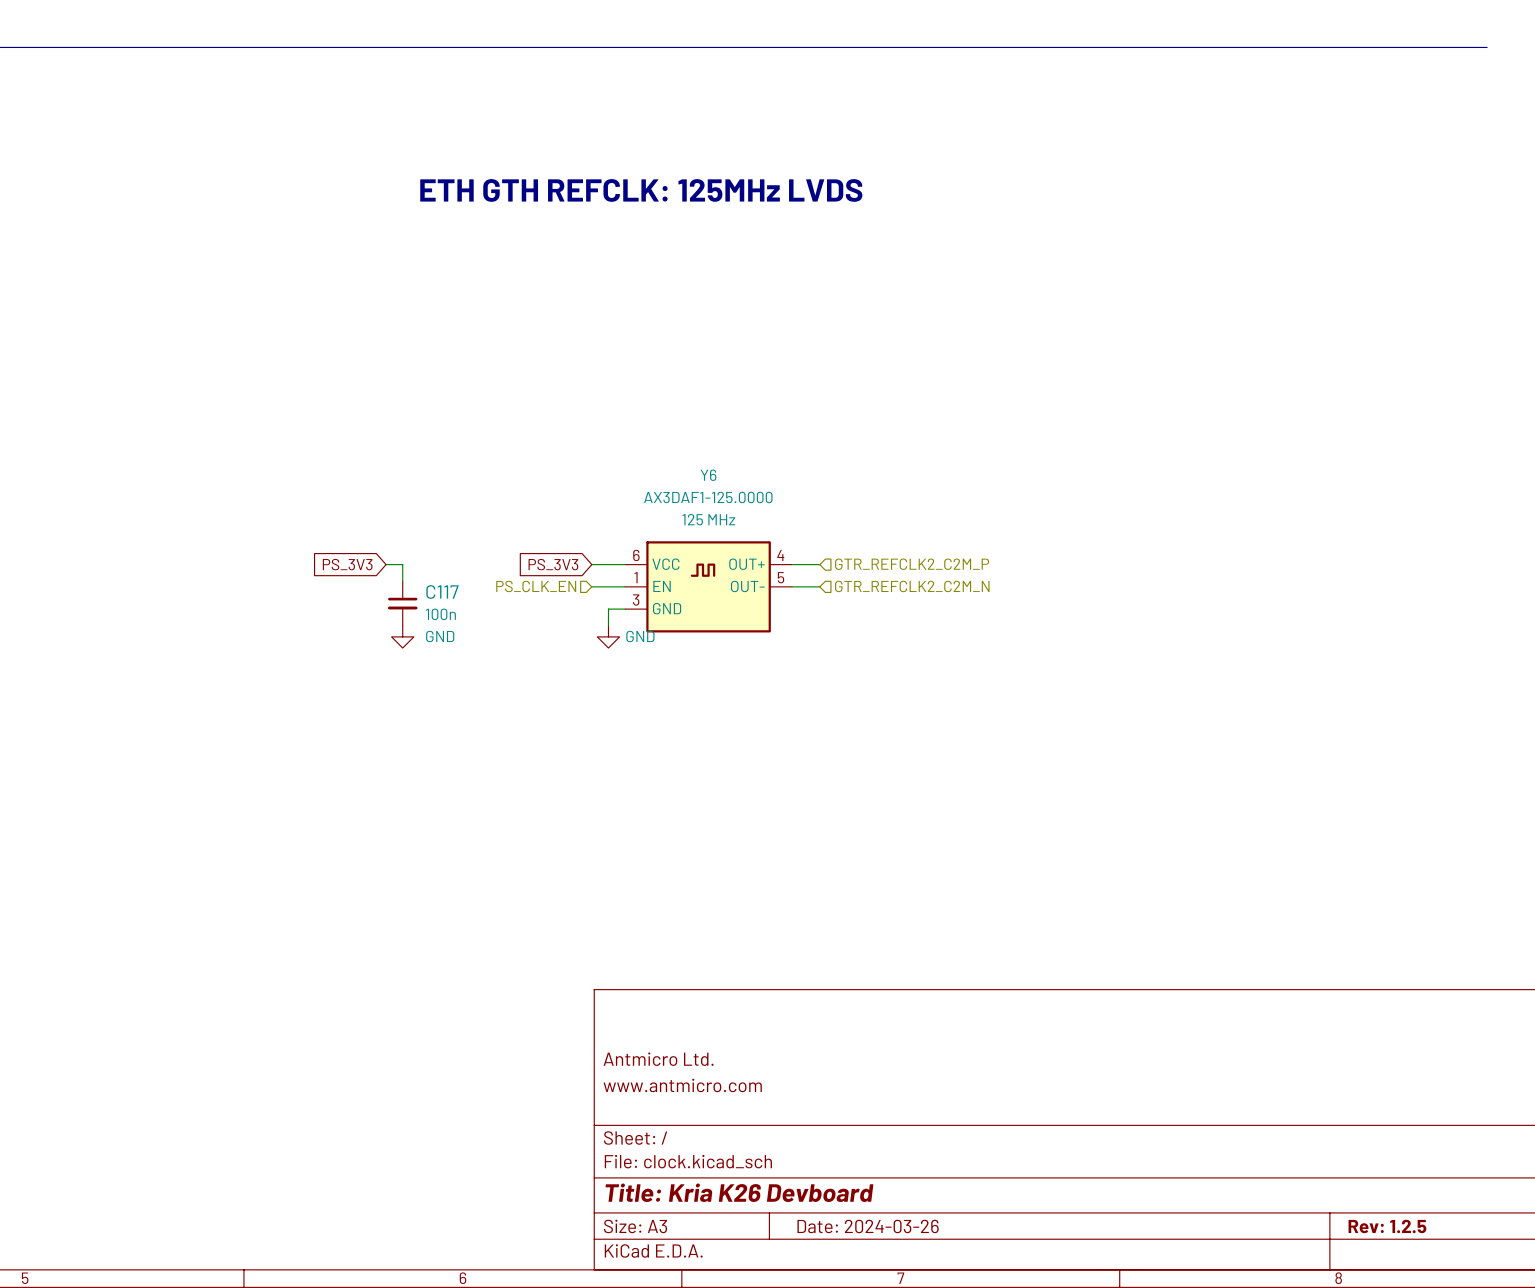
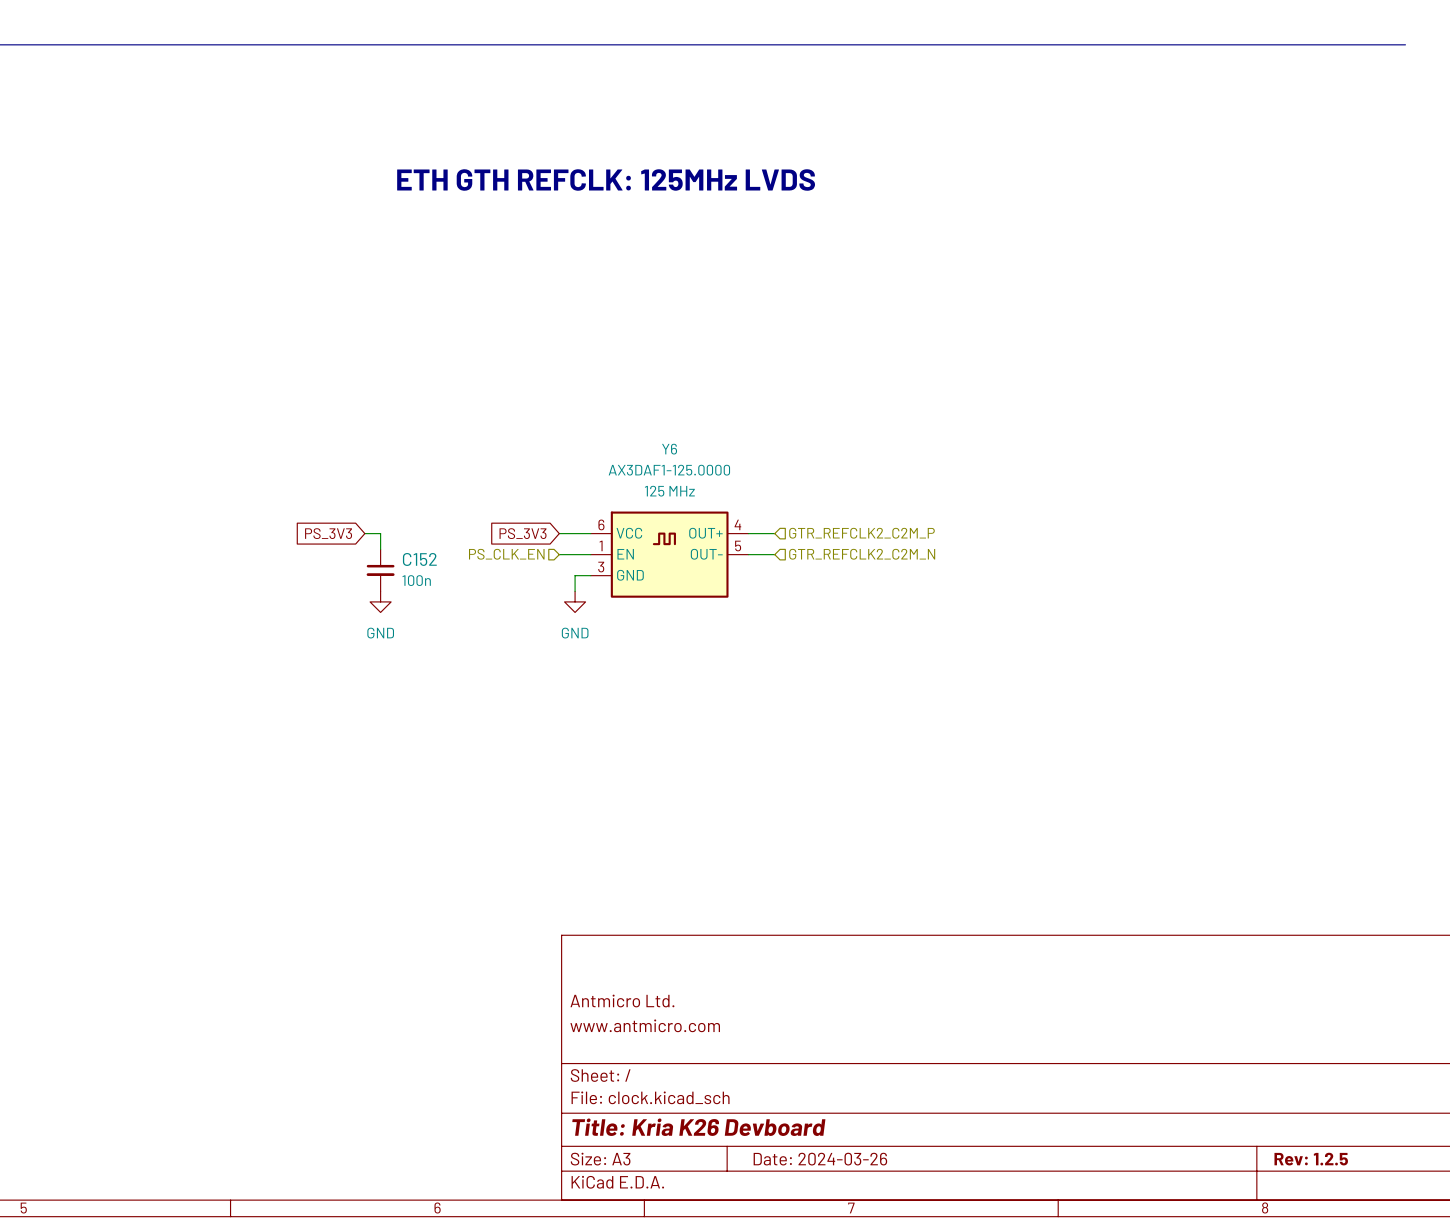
C117 name: C117 (442, 591) -> C152 (419, 559)
power symbol text position: GND (440, 636) -> GND (380, 633)
power symbol text position: GND (640, 636) -> GND (575, 633)

